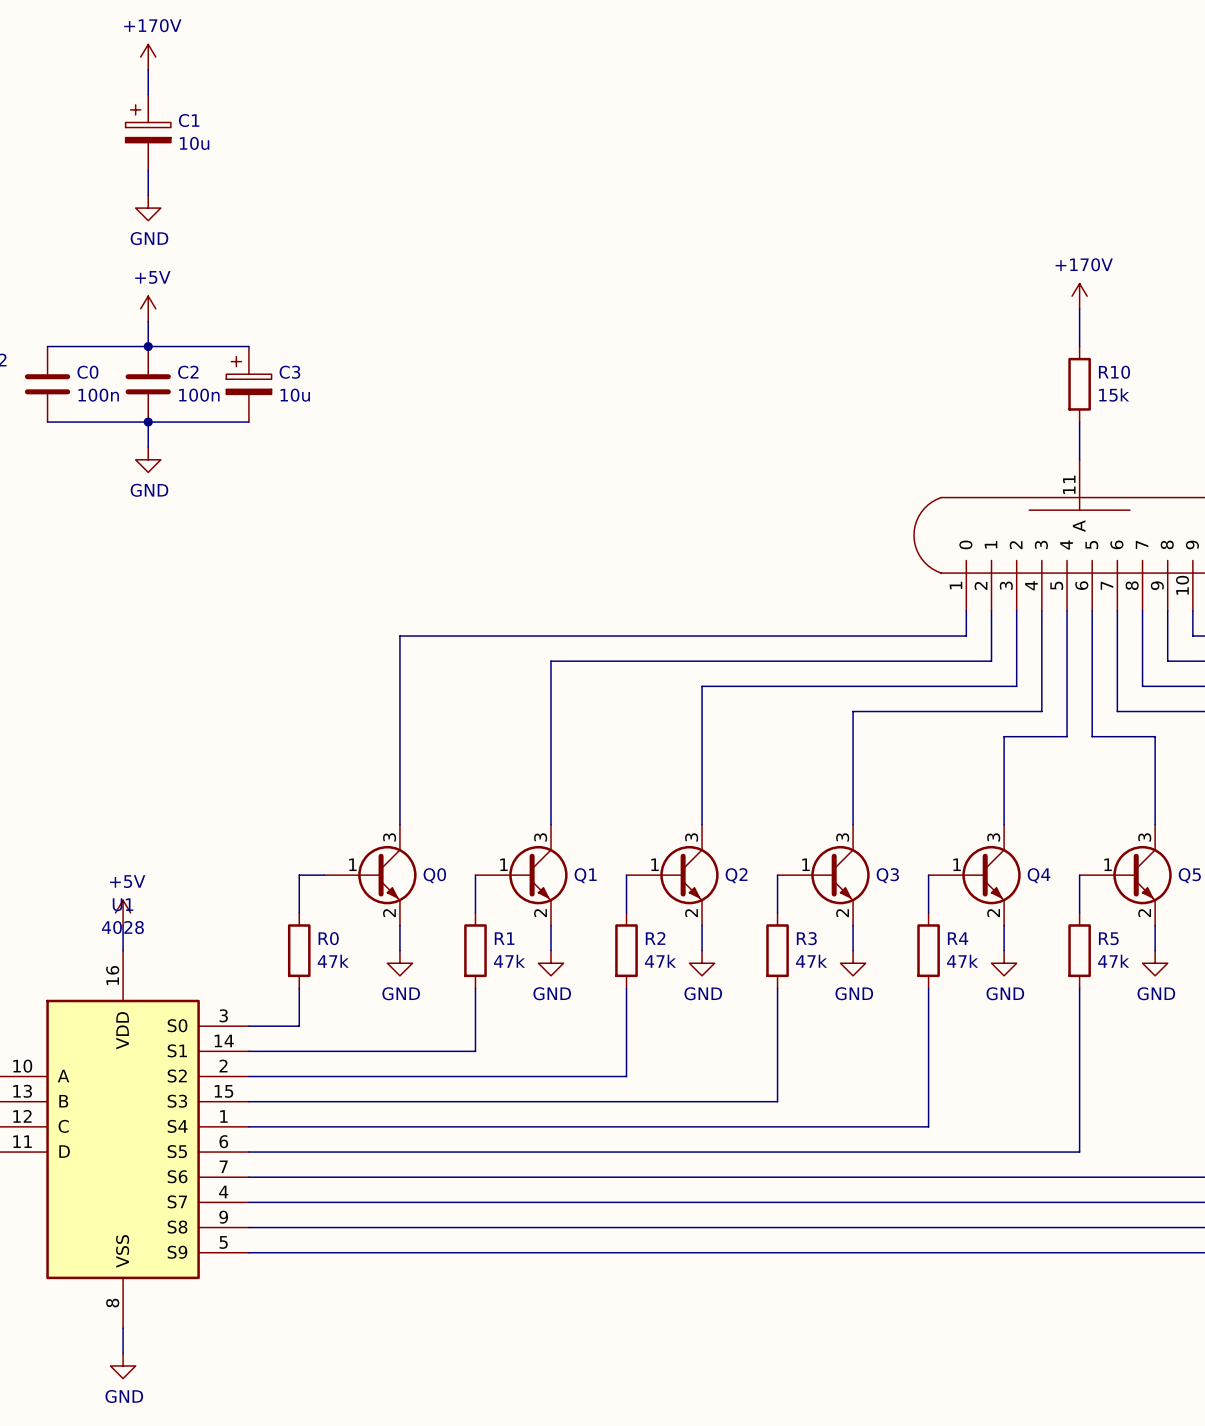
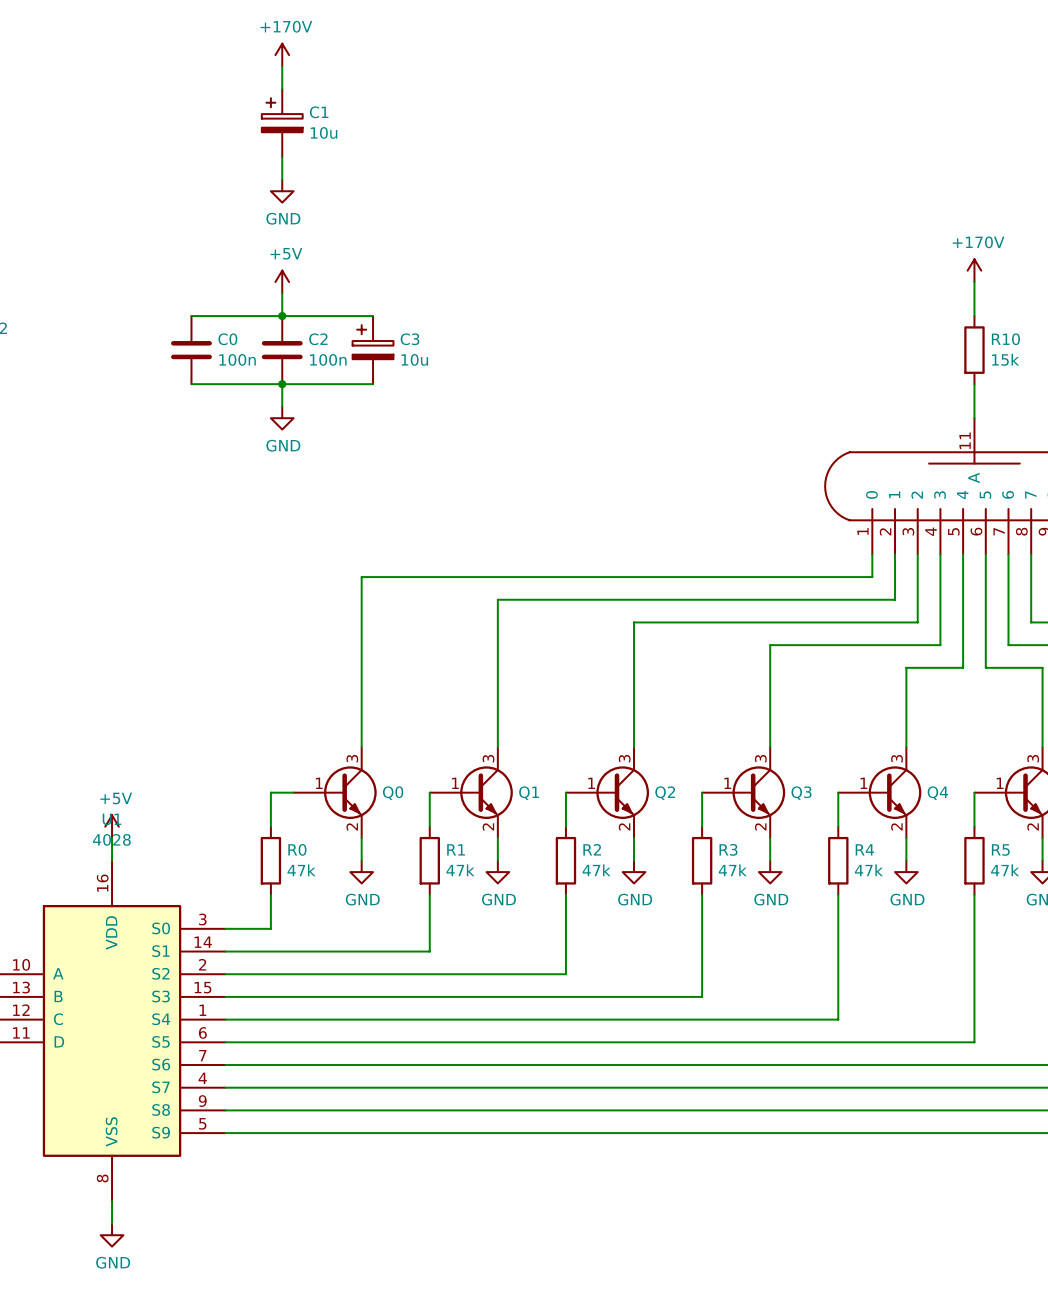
power symbol position: +170V (148, 57) -> +170V (282, 55)
wire: (148, 69) (148, 94) -> (282, 66) (282, 89)
C1 position: (148, 132) -> (282, 123)
wire: (148, 170) (148, 195) -> (282, 157) (282, 179)
power symbol: GND (148, 208) -> none
power symbol: none -> GND (282, 191)
power symbol position: +5V (148, 308) -> +5V (282, 282)
wire: (148, 321) (148, 346) -> (282, 293) (282, 316)
wire: (47, 346) (211, 346) -> (225, 316) (373, 316)
junction: (148, 346) -> none
junction: none -> (282, 316)
C0 position: (47, 384) -> (191, 350)
C2 position: (148, 384) -> (282, 350)
C3 position: (248, 384) -> (373, 350)
wire: (47, 422) (211, 422) -> (225, 384) (373, 384)
wire: (148, 422) (148, 447) -> (282, 384) (282, 406)
junction: (148, 422) -> none
junction: none -> (282, 384)
power symbol: GND (148, 459) -> none
power symbol: none -> GND (282, 418)

